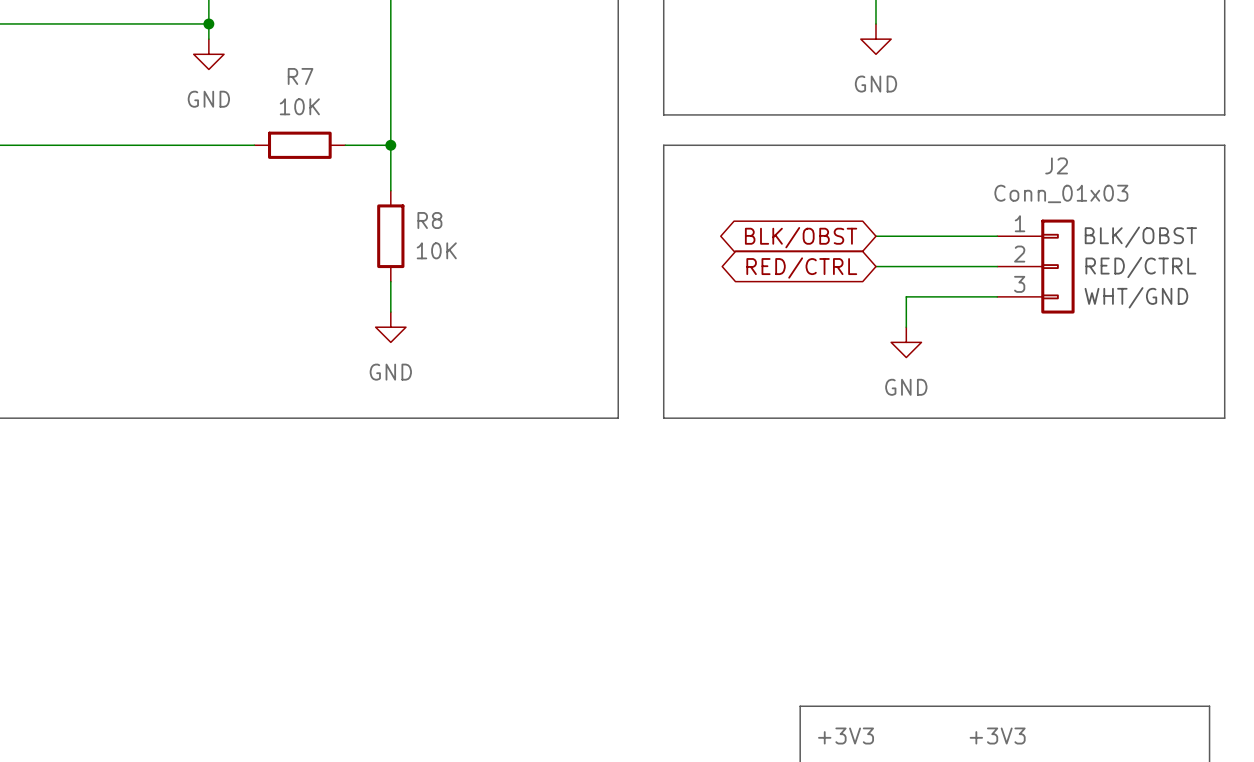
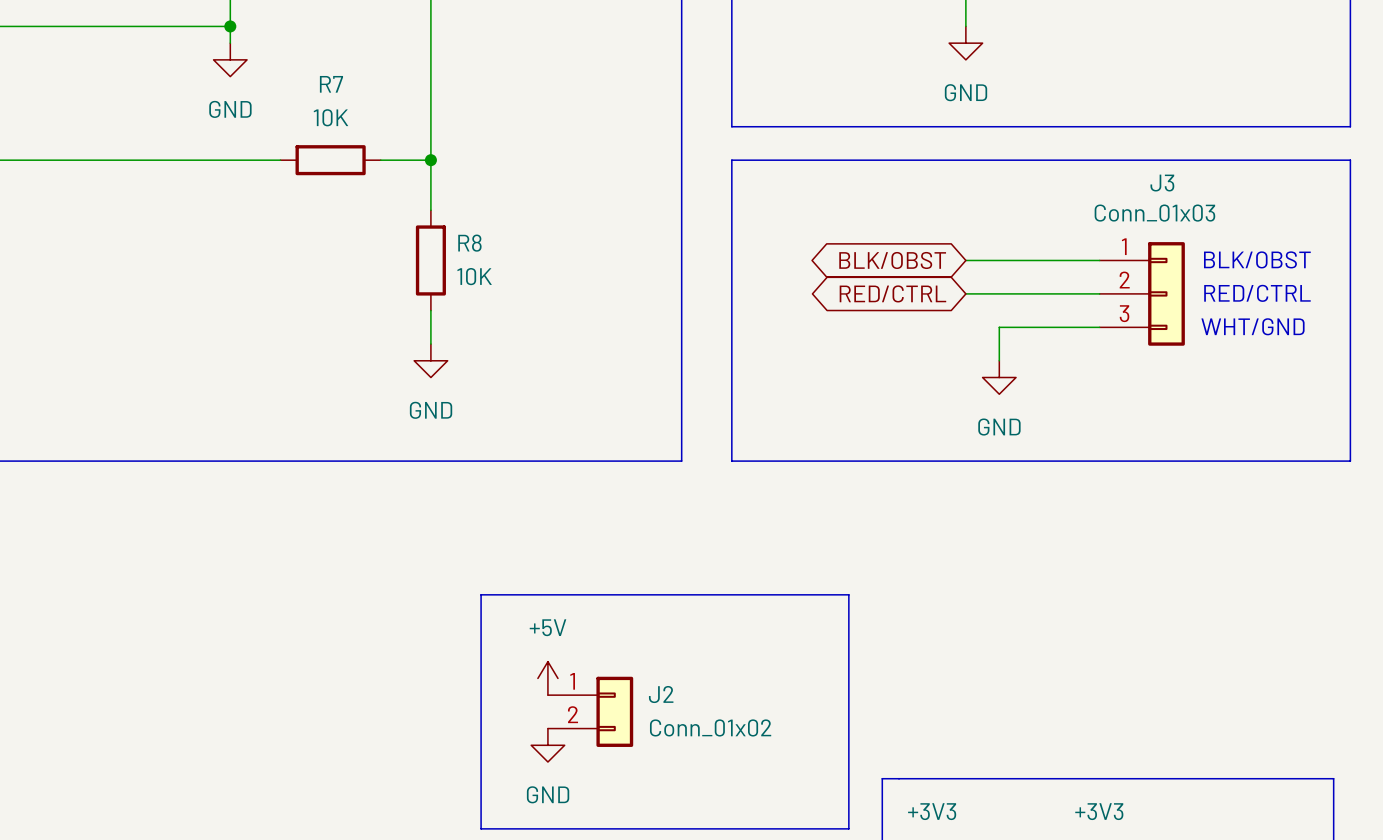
J2 name: J2 (1056, 165) -> J3 (1162, 183)
line: none -> (481, 594) (848, 594) (848, 828) (481, 828) (481, 594)
power symbol: none -> +5V (547, 678)
J2: none -> Conn_01x02 (590, 711)
power symbol: none -> GND (547, 745)

